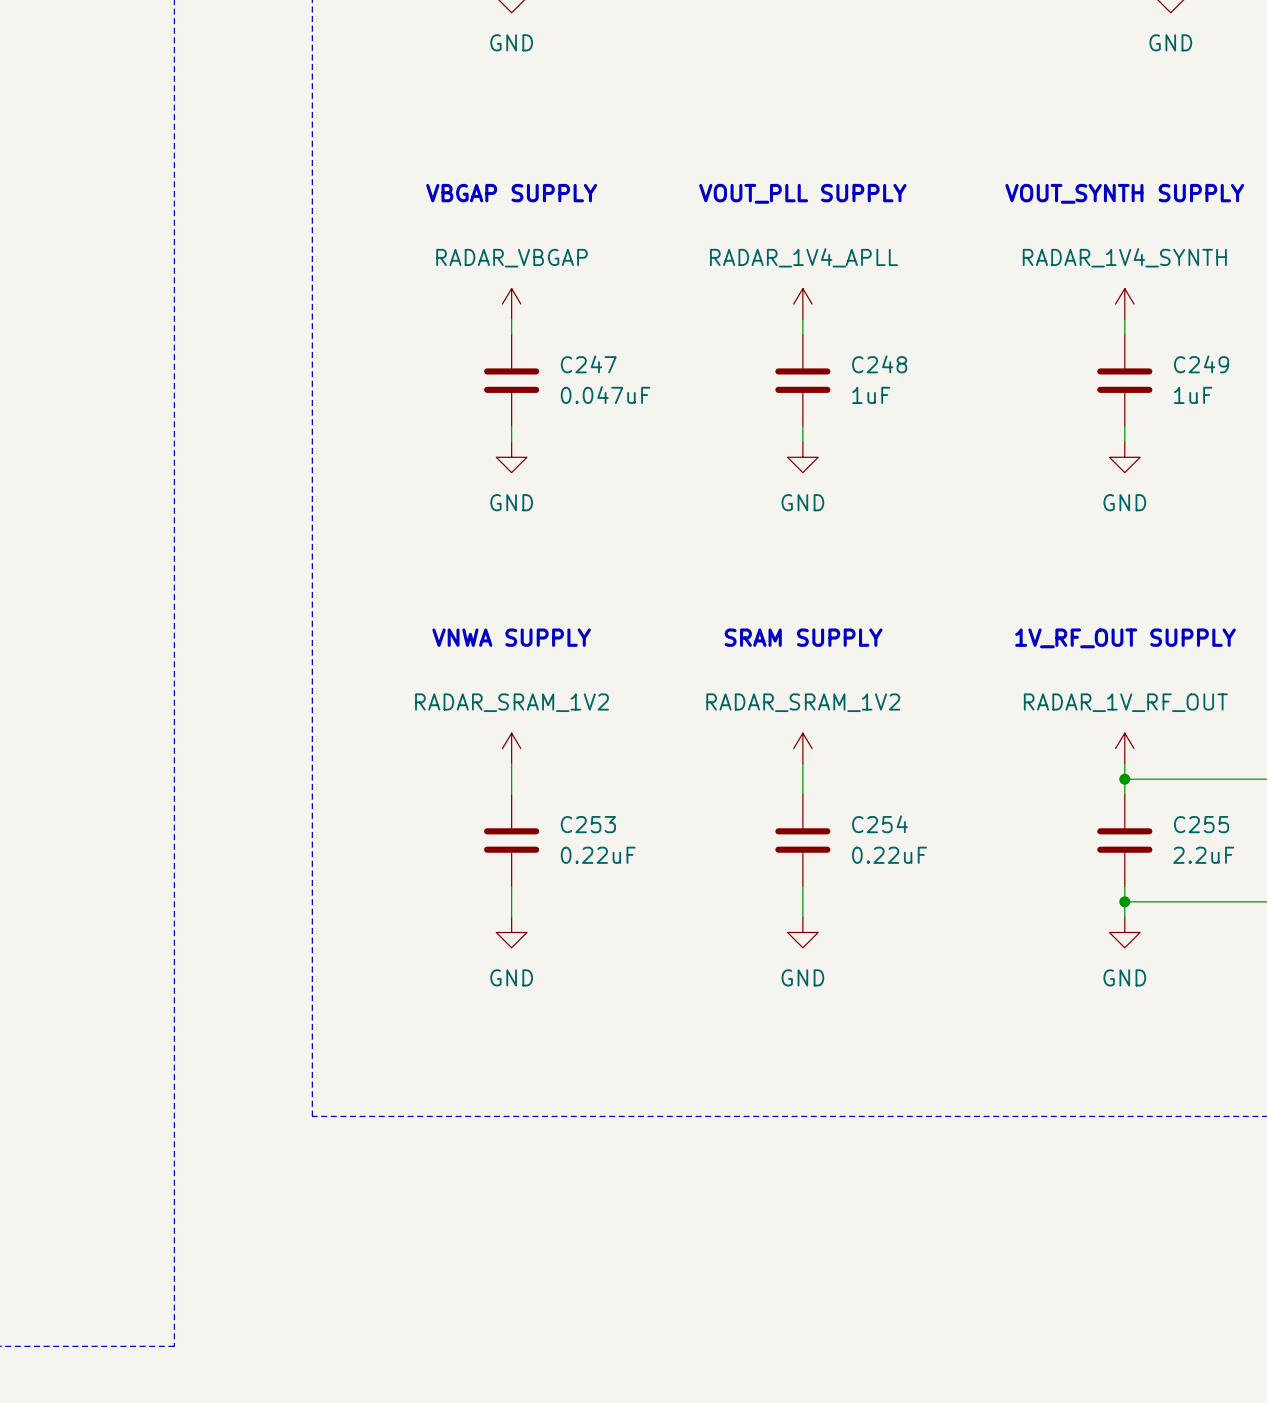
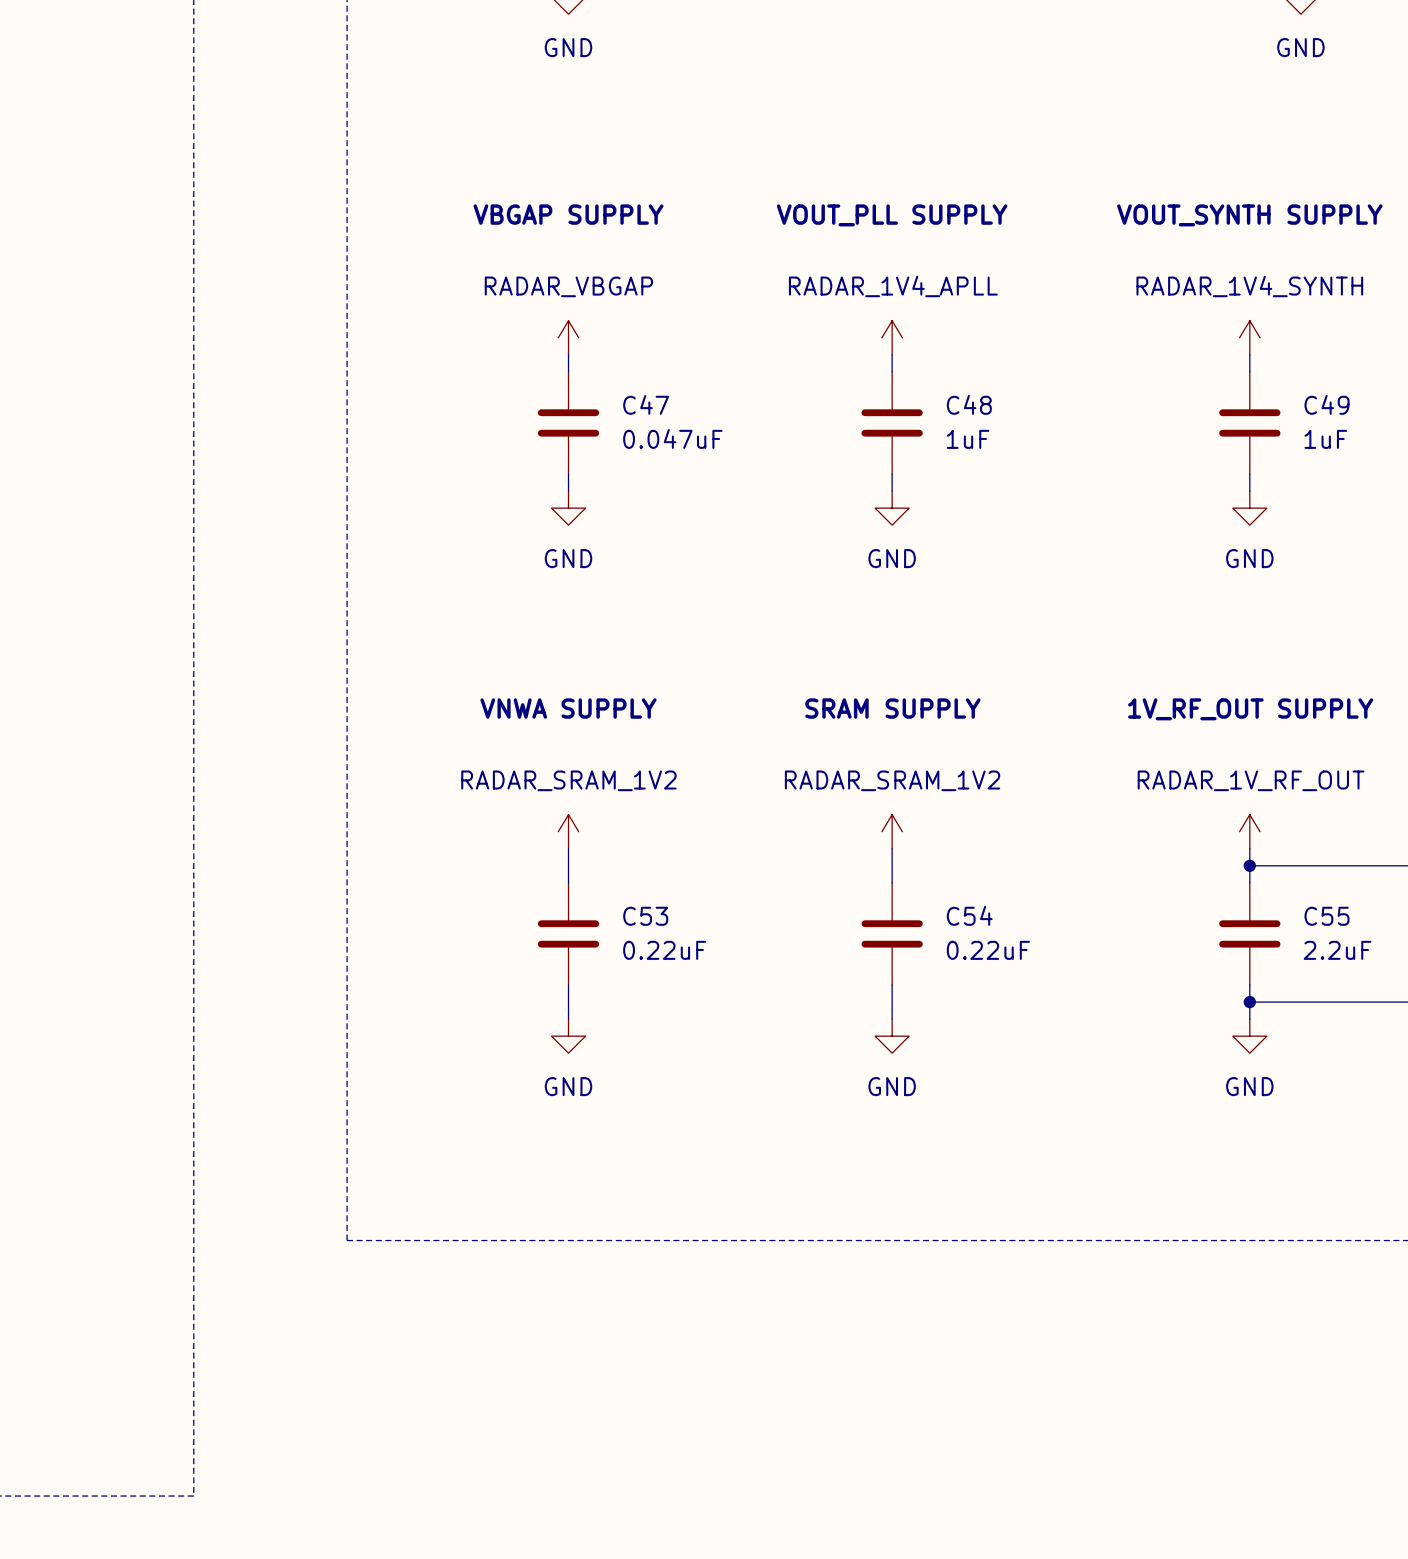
C247 name: C247 (588, 364) -> C47 (646, 404)
C248 name: C248 (879, 364) -> C48 (969, 404)
C249 name: C249 (1201, 364) -> C49 (1327, 404)
C253 name: C253 (588, 824) -> C53 (645, 916)
C254 name: C254 (880, 824) -> C54 (969, 915)
C255 name: C255 (1201, 824) -> C55 (1327, 916)

